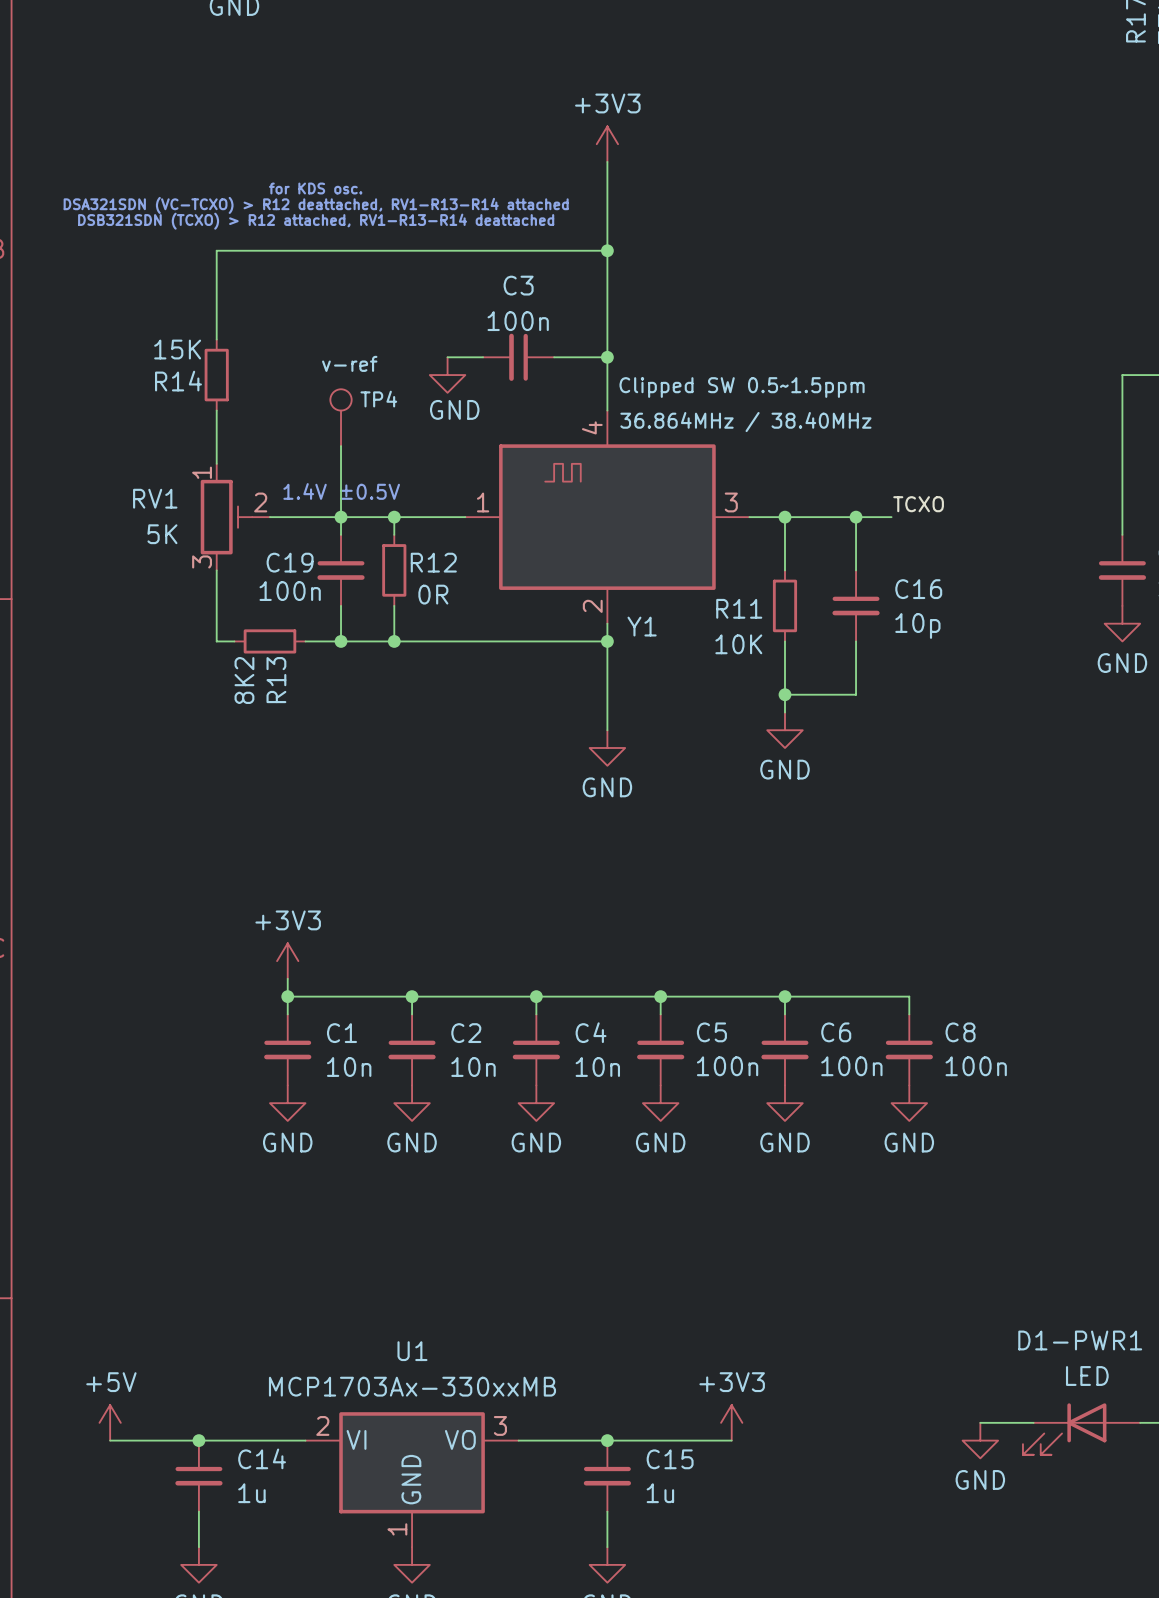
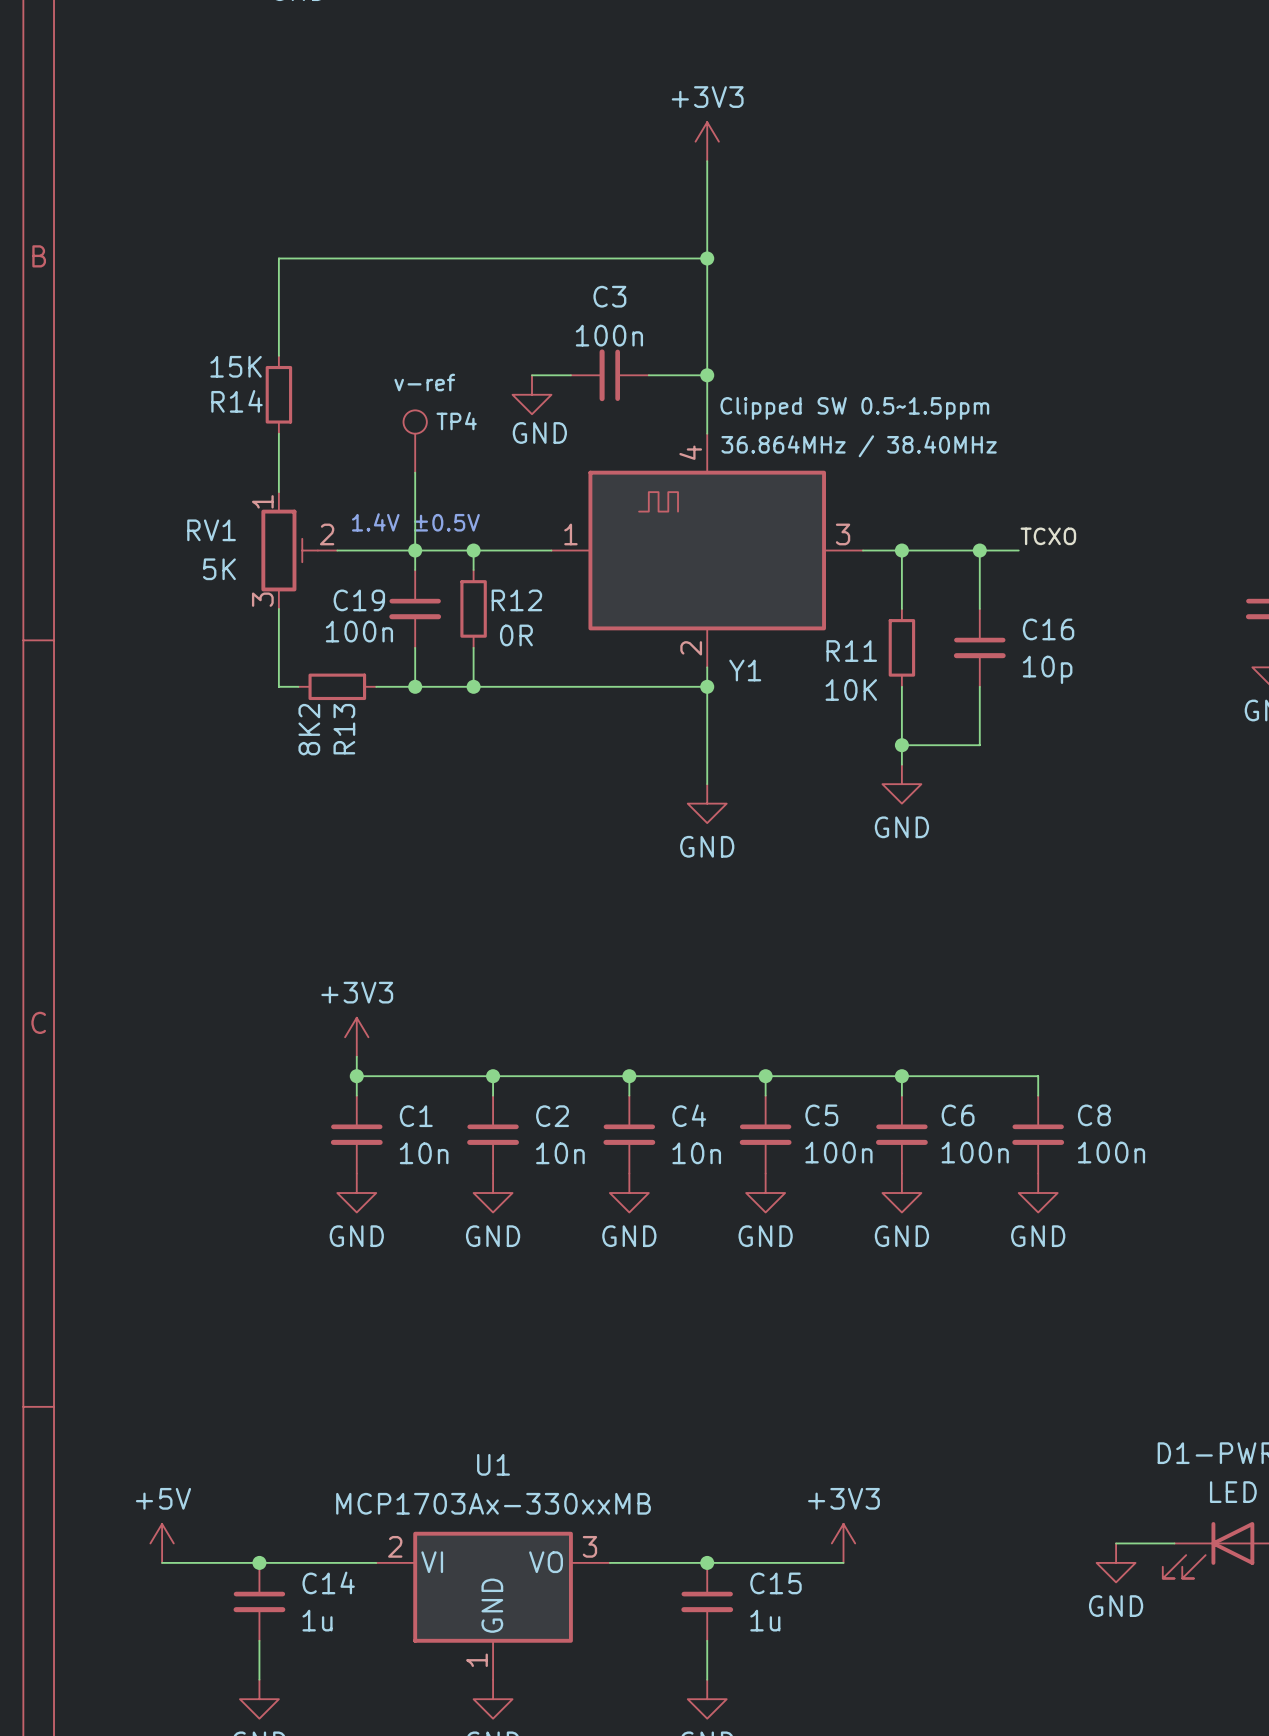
text: for KDS osc. (315, 188) -> none
text: DSA321SDN (VC-TCXO) > R12 deattached, RV1-R13-R14 attached (316, 205) -> none
text: DSB321SDN (TCXO) > R12 attached, RV1-R13-R14 deattached (316, 221) -> none

